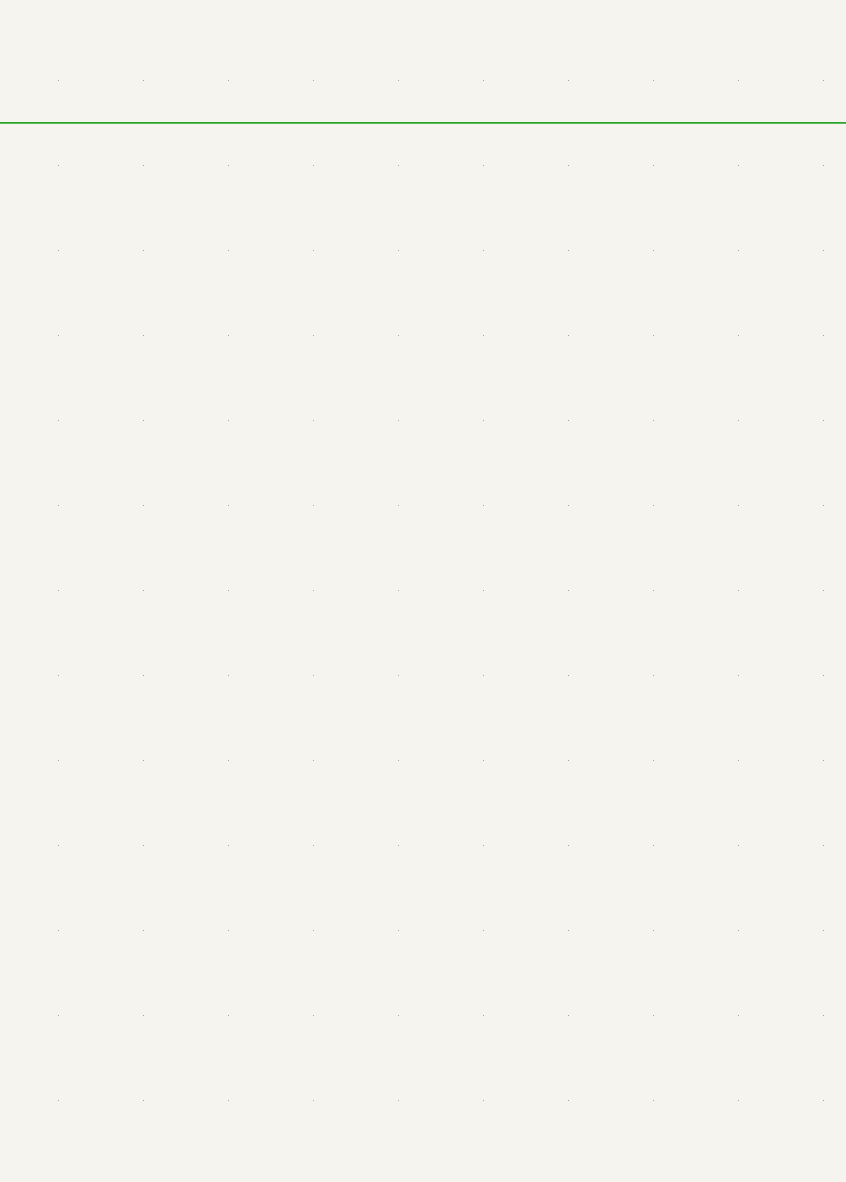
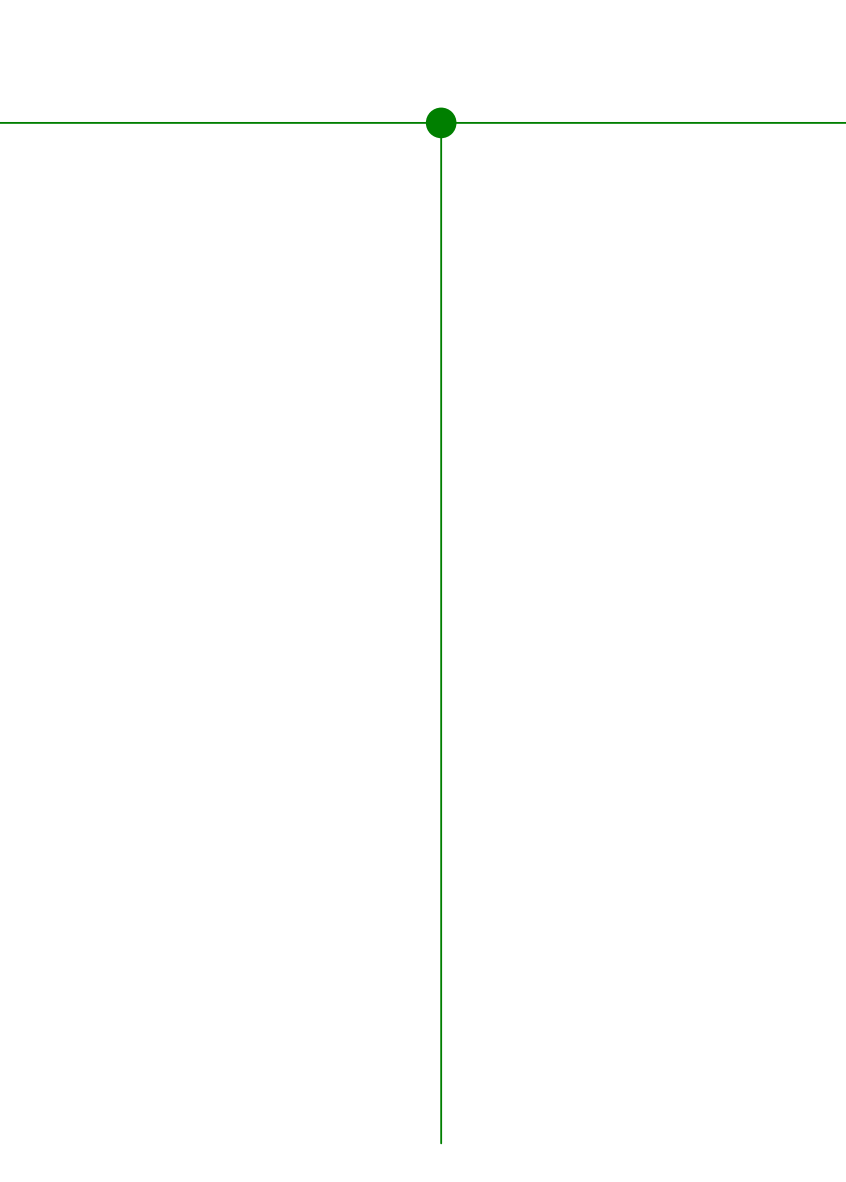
wire: none -> (441, 122) (441, 1143)
junction: none -> (441, 122)

